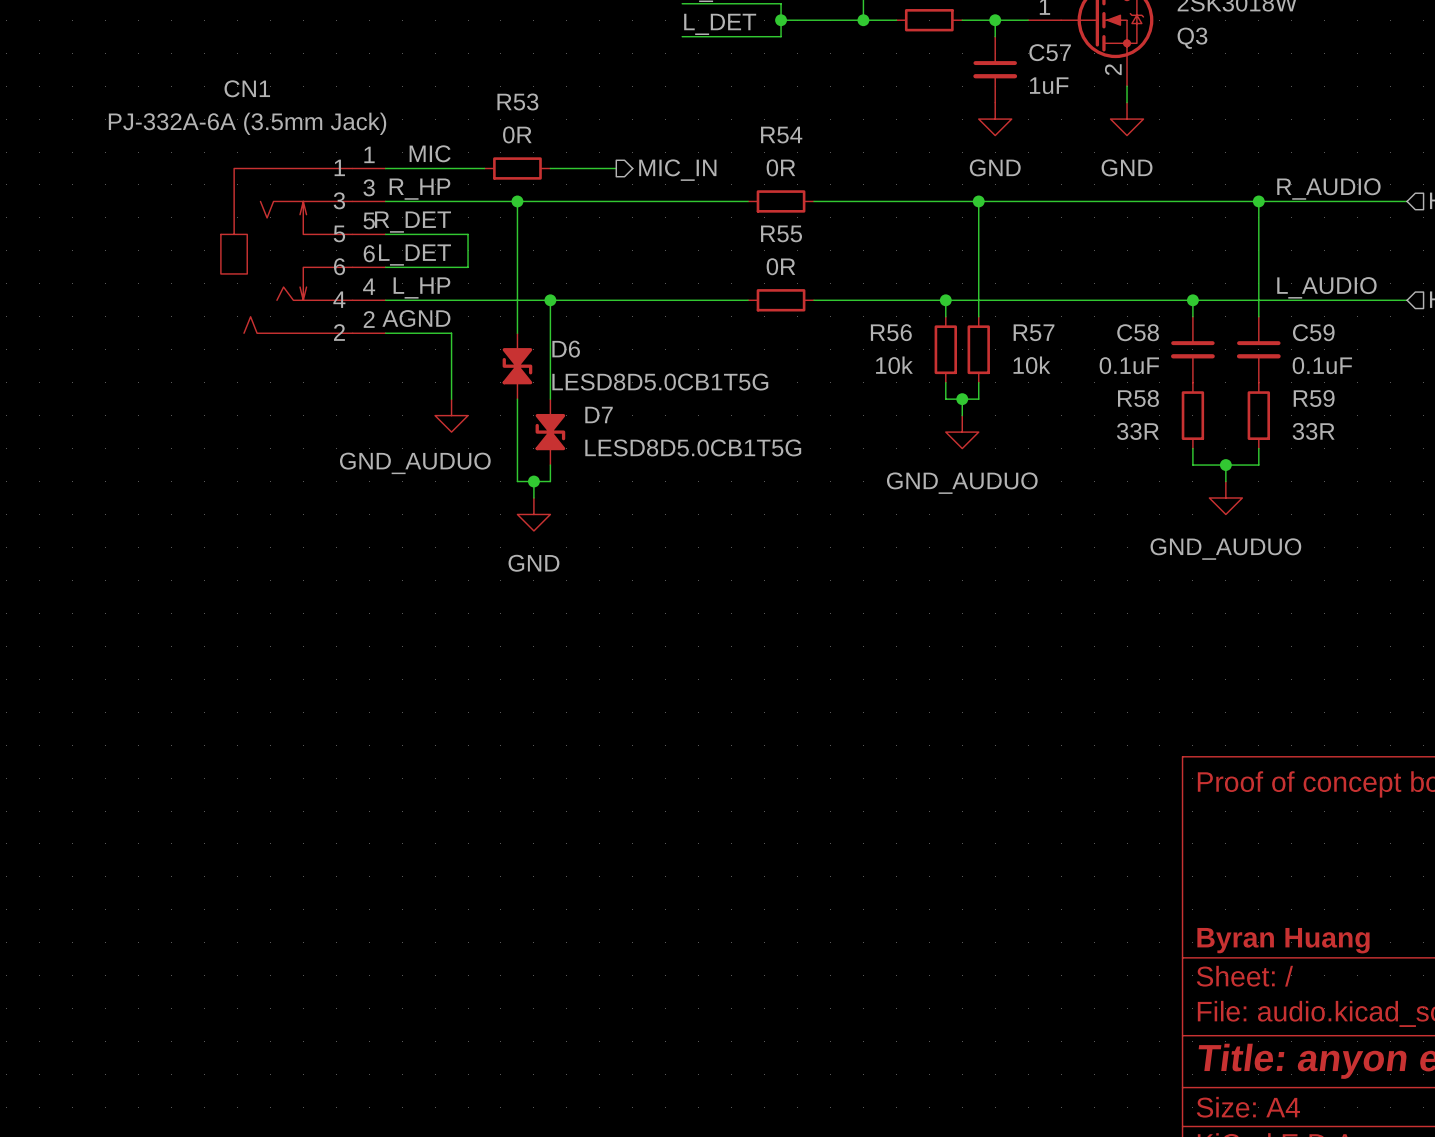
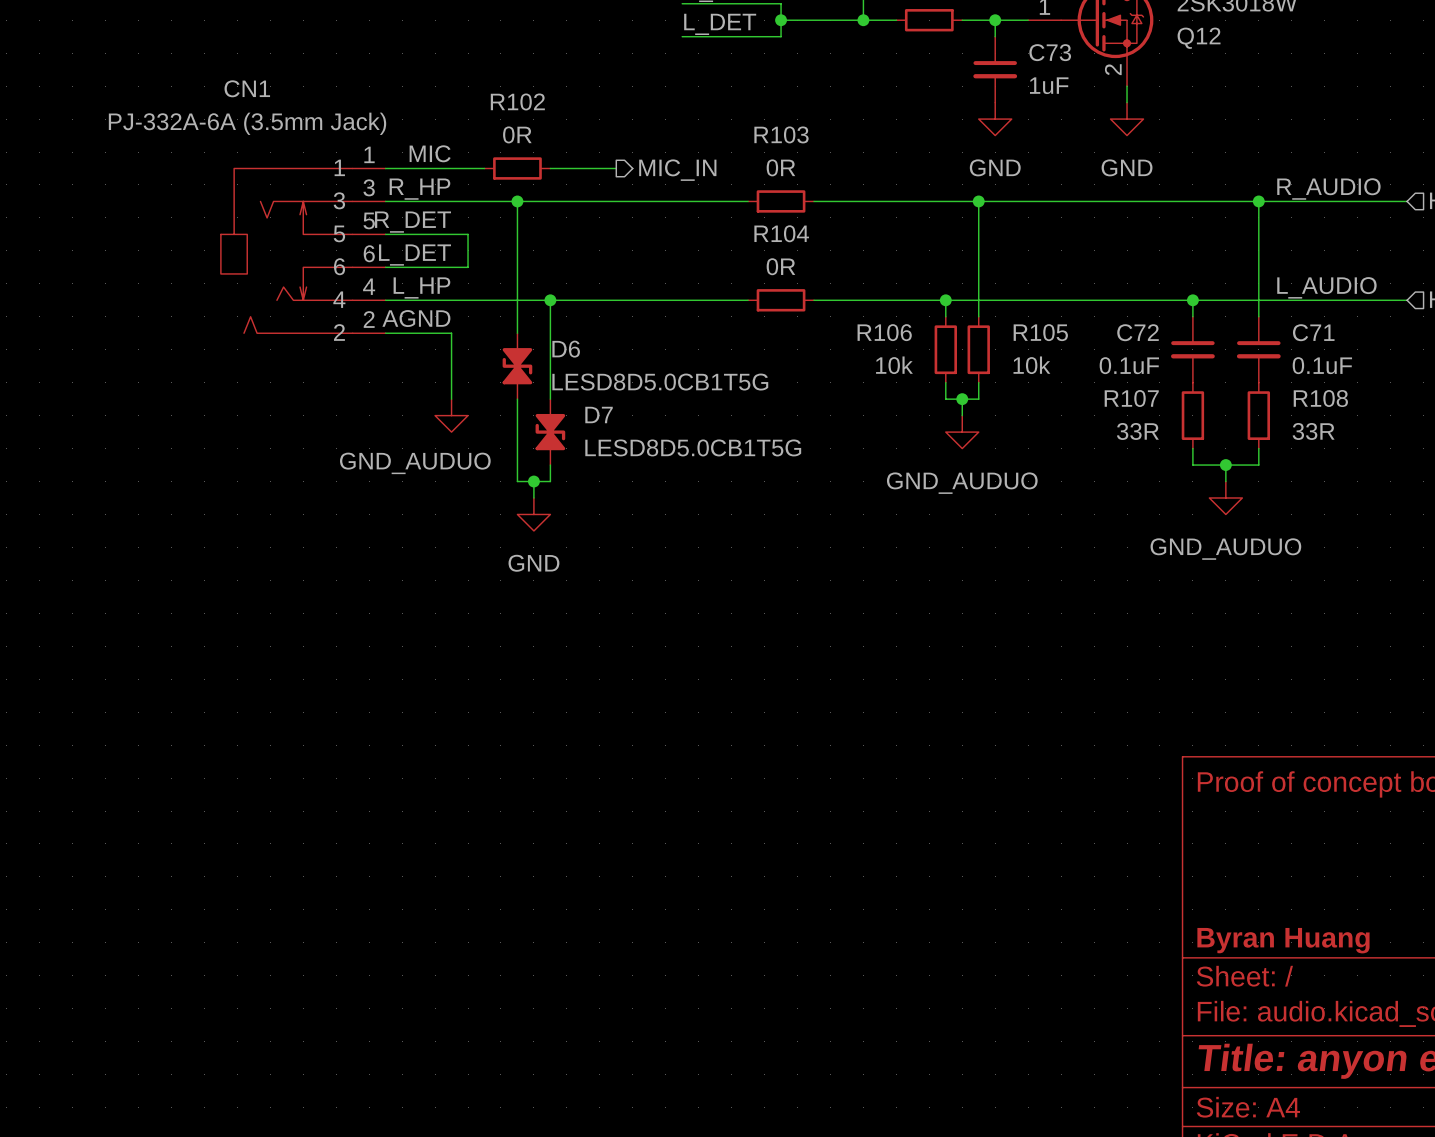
Q3 name: Q3 (1192, 38) -> Q12 (1199, 38)
C57 name: C57 (1050, 52) -> C73 (1050, 52)
R53 name: R53 (517, 101) -> R102 (517, 101)
R54 name: R54 (781, 135) -> R103 (781, 134)
R55 name: R55 (781, 233) -> R104 (781, 233)
R56 name: R56 (891, 332) -> R106 (884, 332)
R57 name: R57 (1034, 332) -> R105 (1040, 332)
C58 name: C58 (1138, 332) -> C72 (1138, 332)
C59 name: C59 (1313, 332) -> C71 (1313, 332)
R58 name: R58 (1138, 398) -> R107 (1131, 398)
R59 name: R59 (1314, 398) -> R108 (1320, 398)

